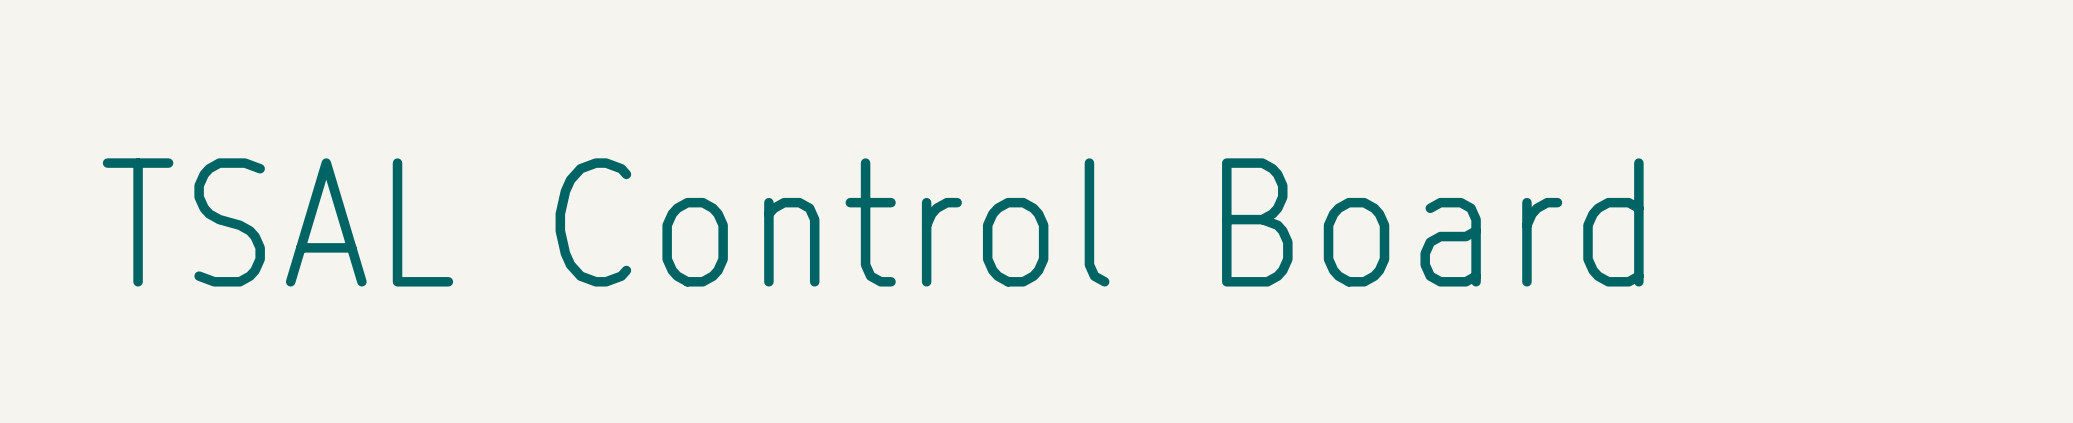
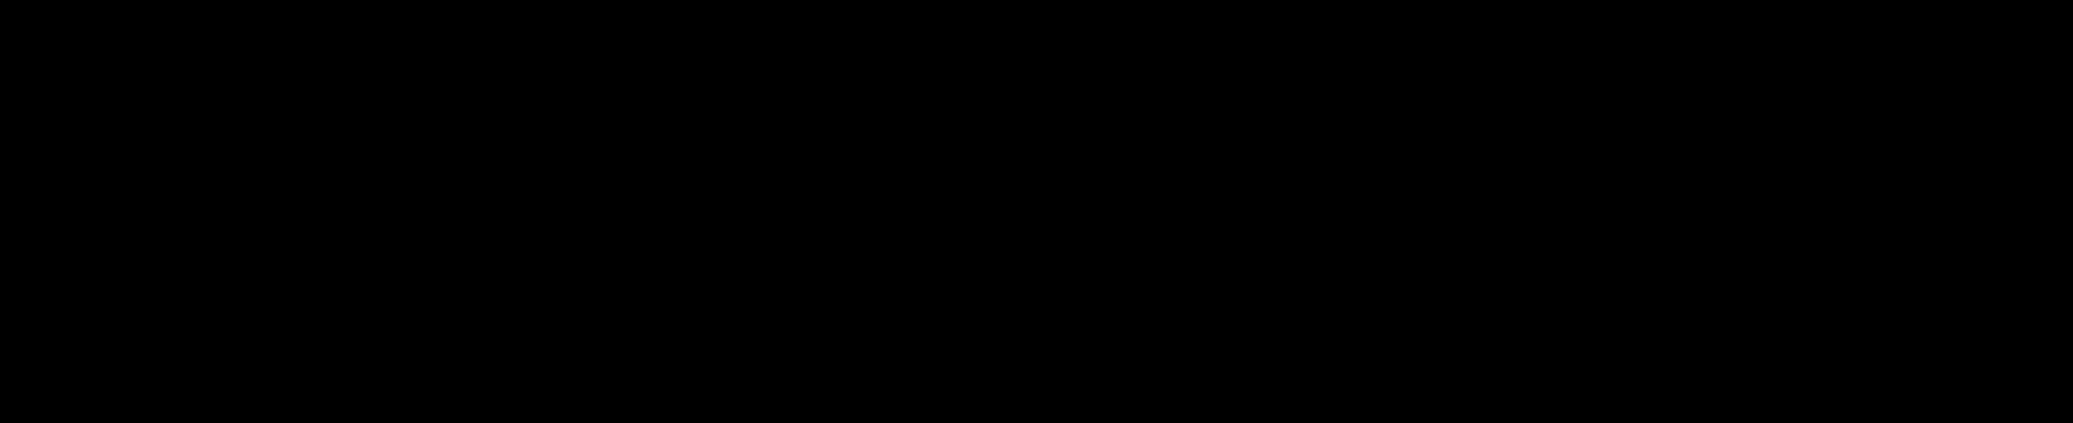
text: TSAL Control Board (873, 222) -> none

